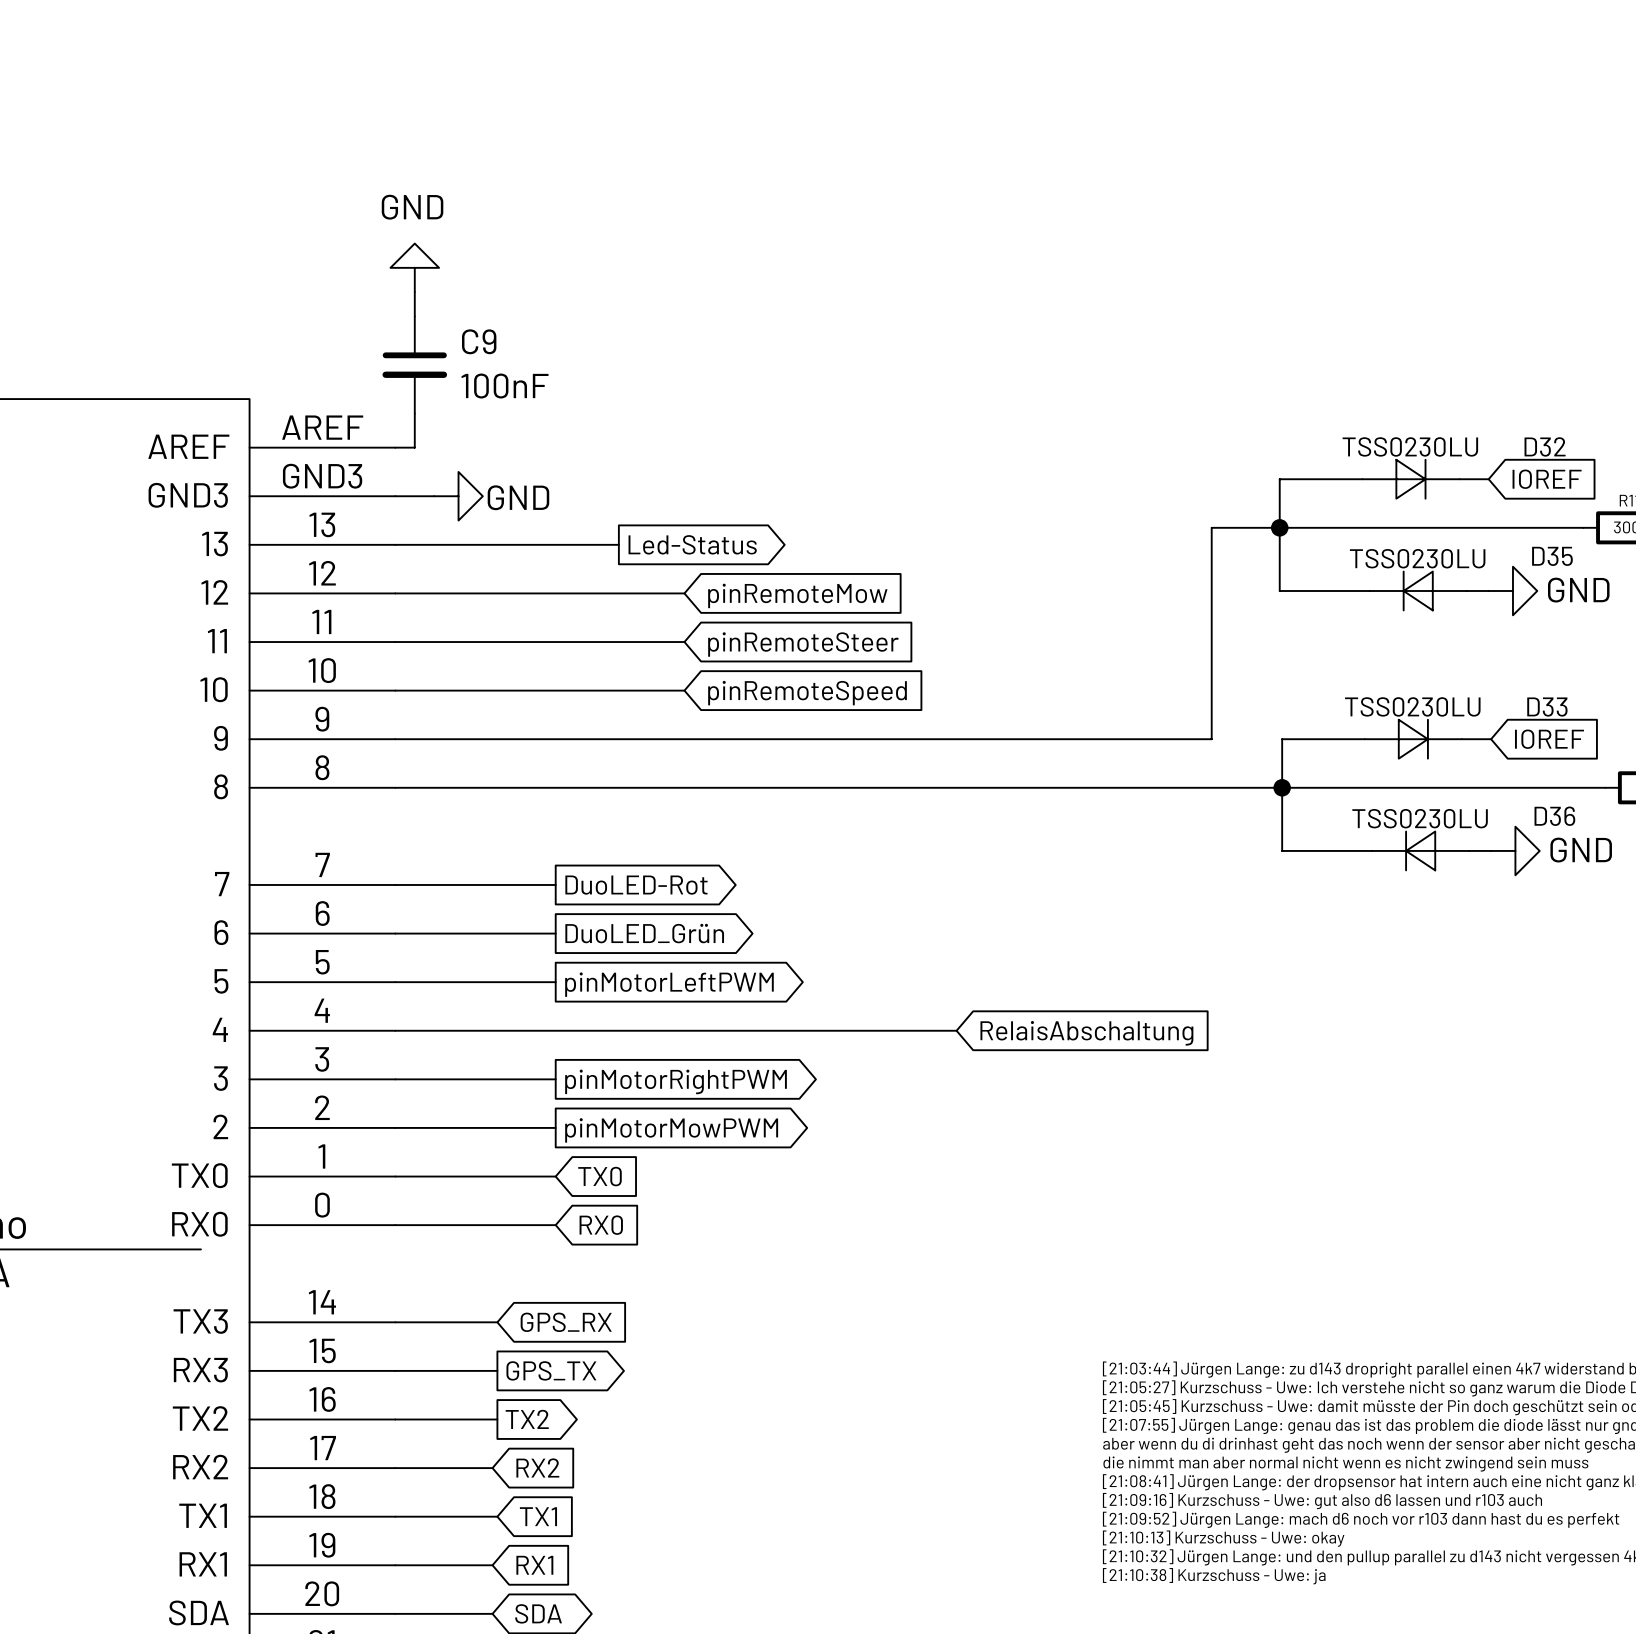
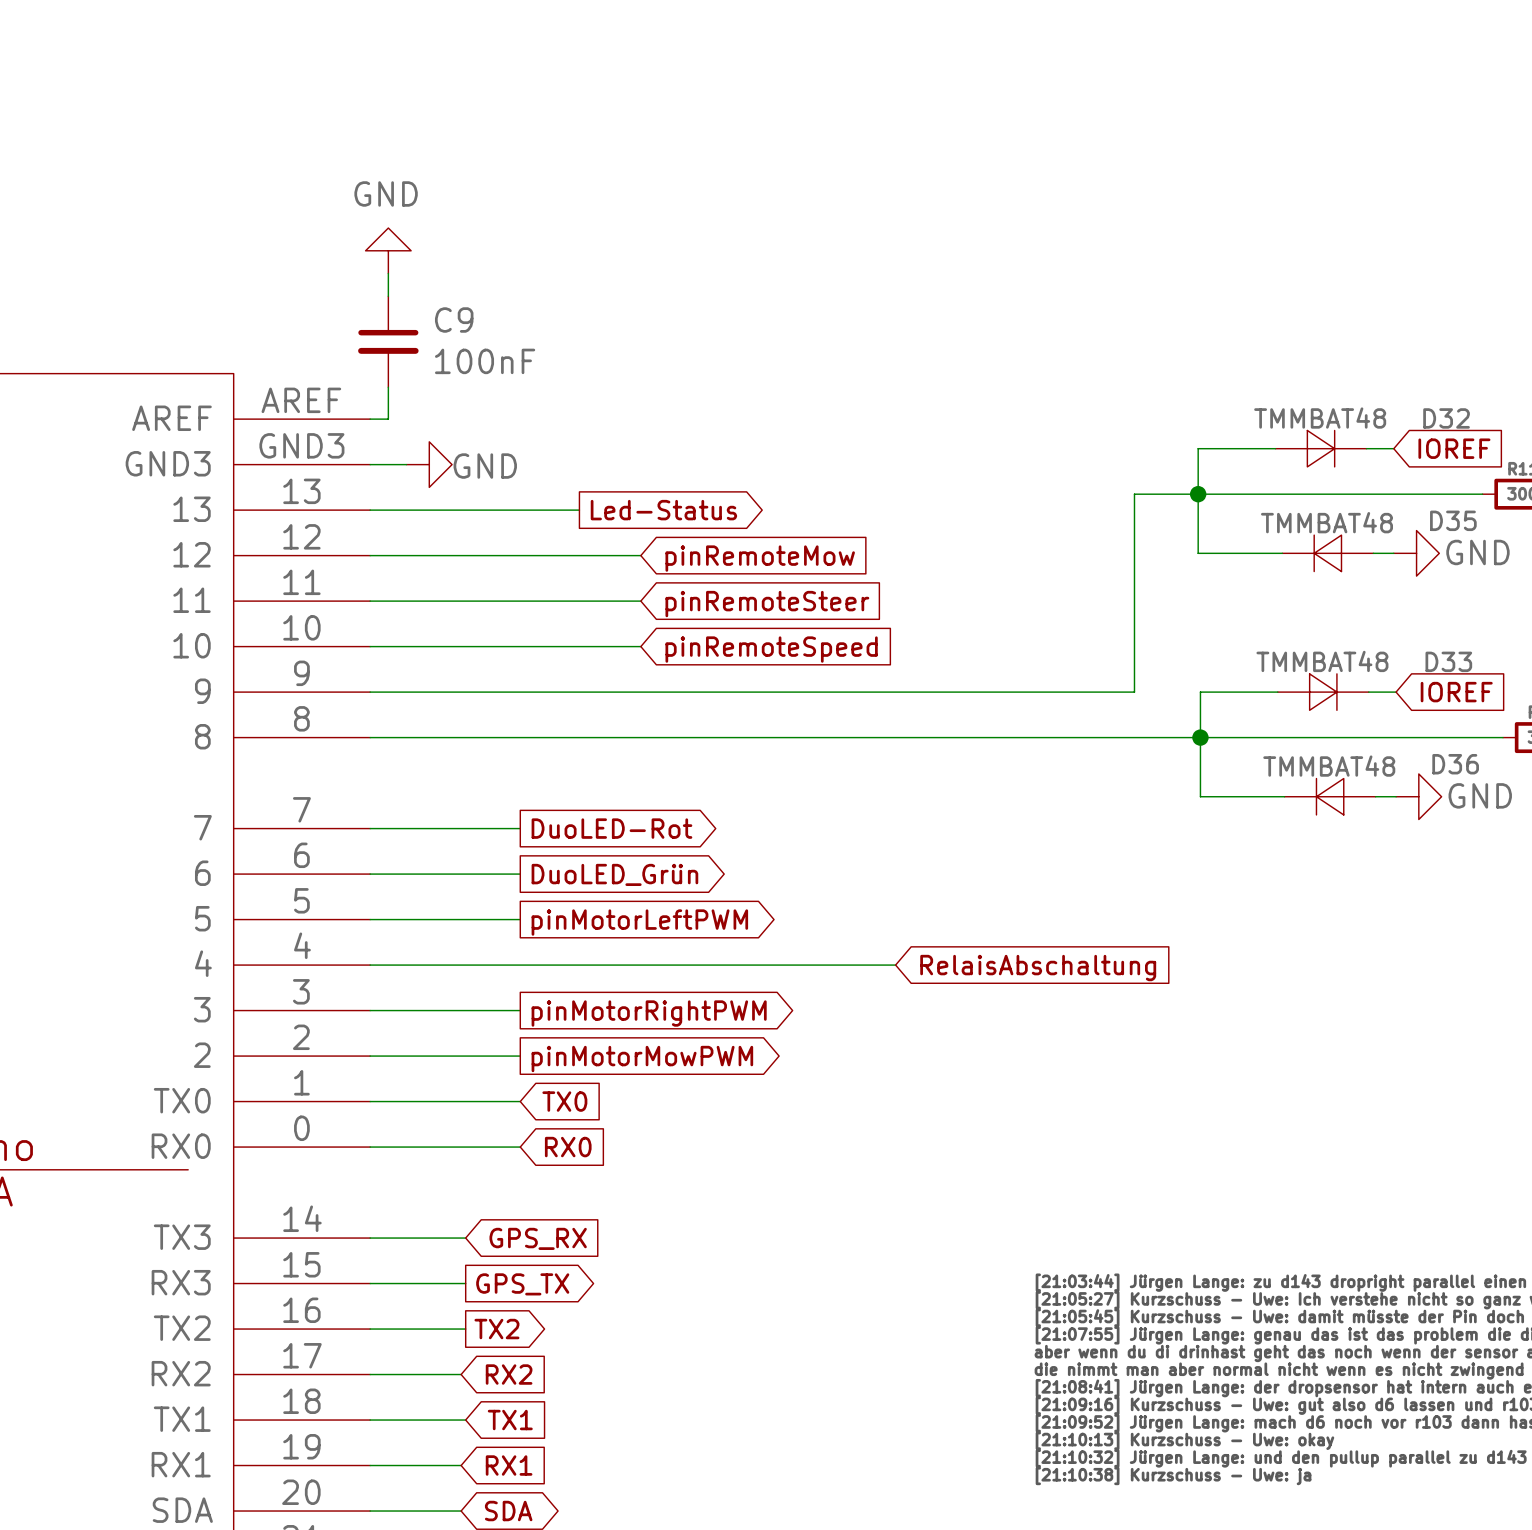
D32 value: TSS0230LU (1410, 446) -> TMMBAT48 (1320, 418)
D35 value: TSS0230LU (1417, 558) -> TMMBAT48 (1326, 522)
D33 value: TSS0230LU (1412, 706) -> TMMBAT48 (1322, 661)
D36 value: TSS0230LU (1420, 818) -> TMMBAT48 (1329, 766)

